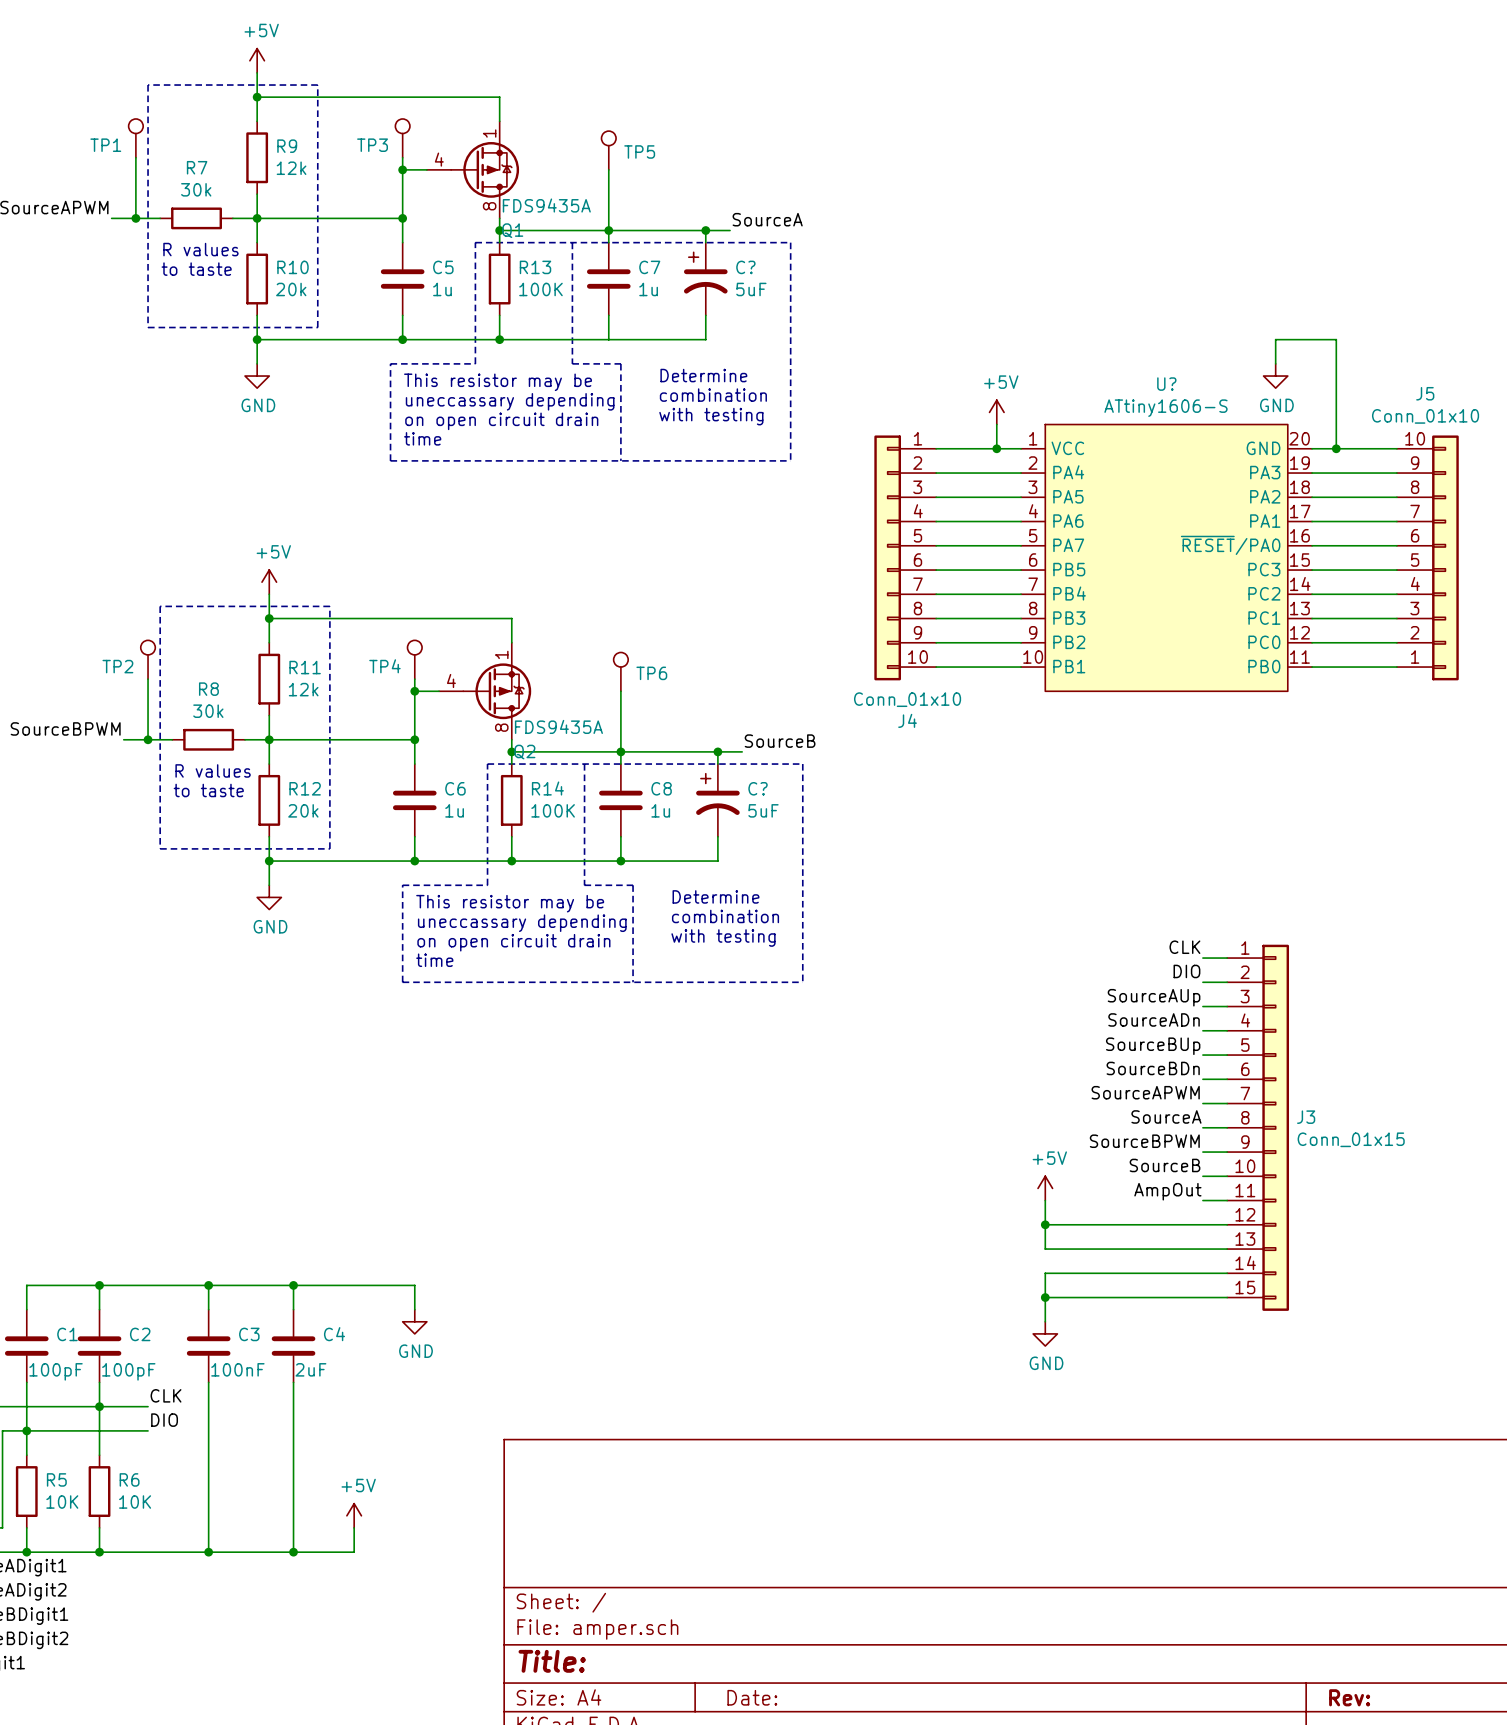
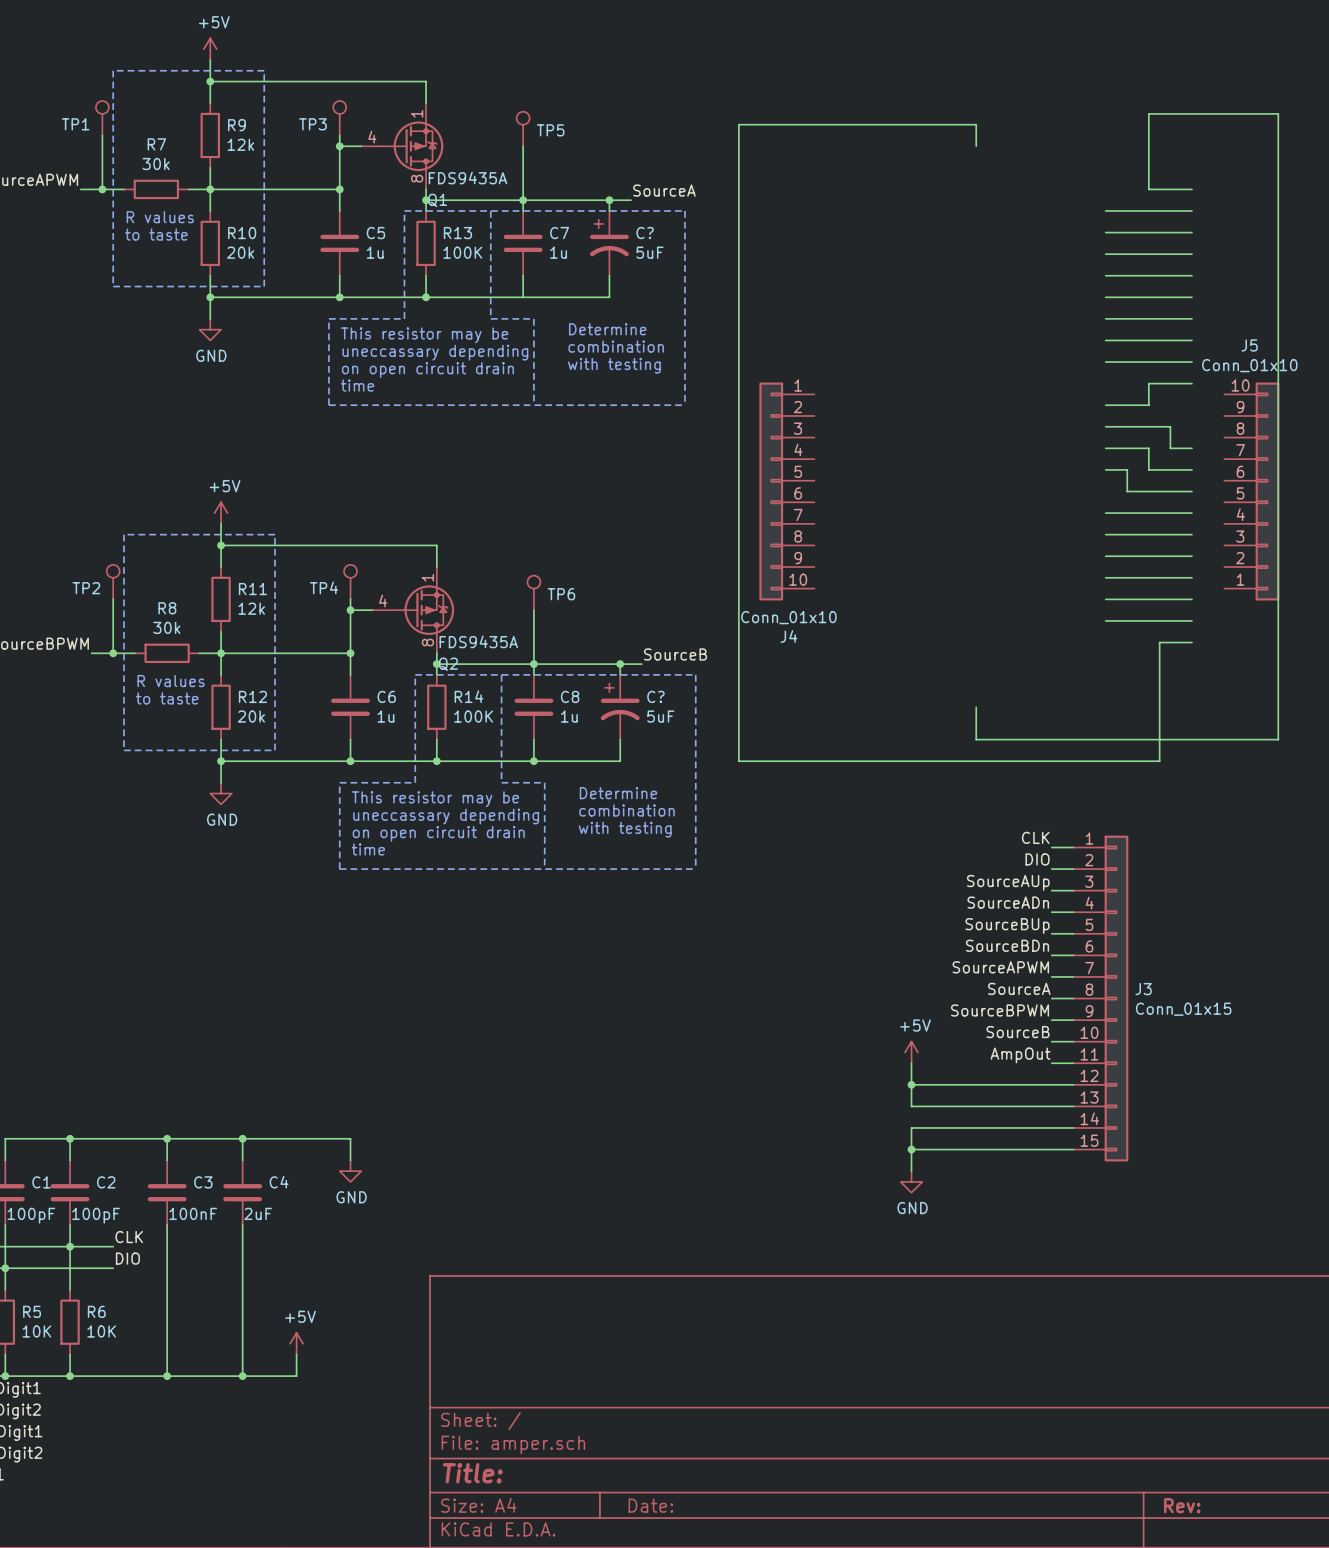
wire: none -> (976, 146) (976, 124) (738, 124) (738, 761) (1159, 761) (1159, 642) (1191, 642)
wire: none -> (1191, 189) (1148, 189) (1148, 113) (1278, 113) (1278, 739) (976, 739) (976, 707)
wire: none -> (1105, 211) (1191, 211)
wire: none -> (1105, 232) (1191, 232)
wire: none -> (1105, 254) (1191, 254)
wire: none -> (1105, 275) (1191, 275)
wire: (1275, 339) (1275, 363) -> (1116, 297) (1105, 297)
wire: (1336, 339) (1336, 448) -> (1170, 297) (1191, 297)
wire: none -> (1105, 318) (1191, 318)
power symbol: GND (1275, 376) -> none
wire: none -> (1105, 340) (1191, 340)
power symbol: +5V (996, 412) -> none
wire: none -> (1105, 362) (1191, 362)
wire: (996, 424) (996, 448) -> none
wire: none -> (1191, 383) (1148, 383) (1148, 405) (1105, 405)
wire: (936, 448) (1021, 448) -> none
junction: (996, 448) -> none
wire: (1312, 448) (1396, 448) -> none
junction: (1336, 448) -> none
wire: (936, 473) (1021, 473) -> none
wire: (1312, 473) (1396, 473) -> none
wire: none -> (1105, 426) (1170, 426) (1170, 448) (1191, 448)
wire: (936, 497) (1021, 497) -> none
wire: (1312, 497) (1396, 497) -> none
wire: none -> (1105, 448) (1148, 448) (1148, 469) (1191, 469)
wire: (936, 521) (1021, 521) -> none
wire: (1312, 521) (1396, 521) -> none
wire: none -> (1105, 469) (1127, 469) (1127, 491) (1191, 491)
wire: (936, 545) (1021, 545) -> none
wire: (1312, 545) (1396, 545) -> none
U?: ATtiny1606-S (1166, 557) -> none
wire: (936, 570) (1021, 570) -> none
wire: (1312, 570) (1396, 570) -> none
wire: none -> (1105, 513) (1191, 513)
wire: (936, 594) (1021, 594) -> none
wire: (1312, 594) (1396, 594) -> none
wire: none -> (1105, 534) (1191, 534)
wire: (936, 618) (1021, 618) -> none
wire: (1312, 618) (1396, 618) -> none
wire: none -> (1105, 556) (1191, 556)
wire: (936, 642) (1021, 642) -> none
wire: (1312, 642) (1396, 642) -> none
wire: none -> (1105, 577) (1191, 577)
wire: (936, 667) (1021, 667) -> none
wire: (1312, 667) (1396, 667) -> none
wire: none -> (1105, 599) (1191, 599)
wire: none -> (1105, 620) (1191, 620)

